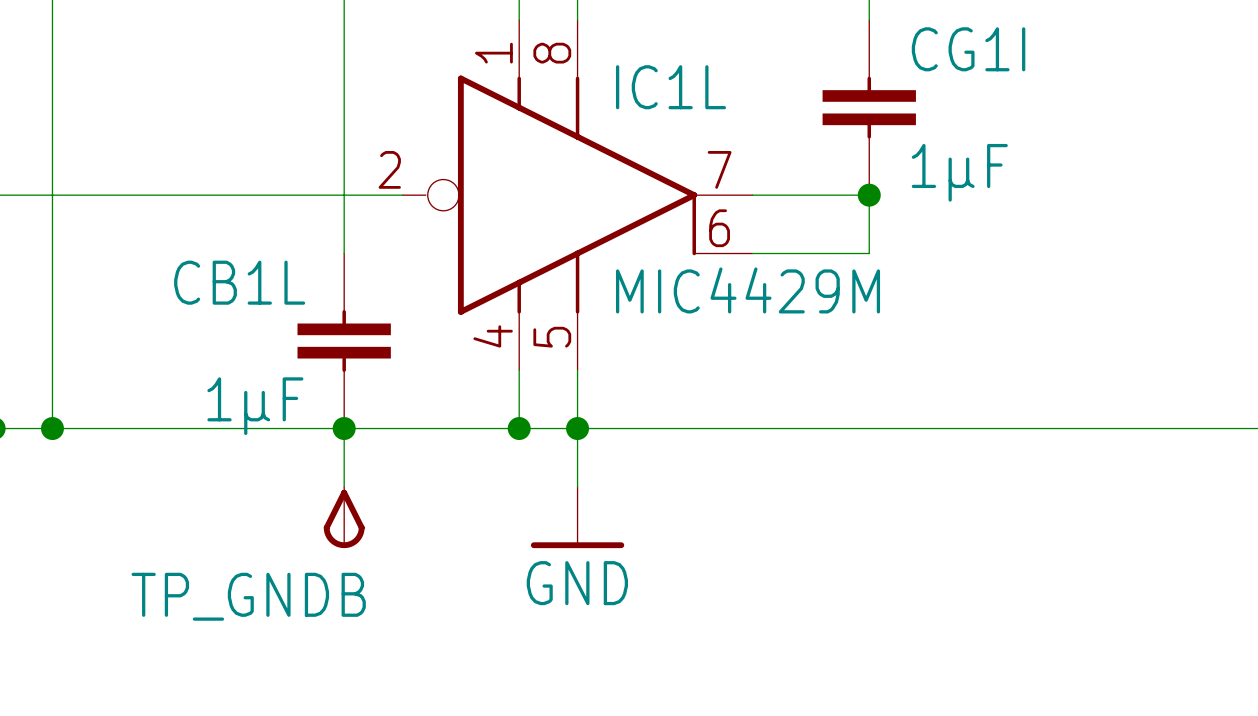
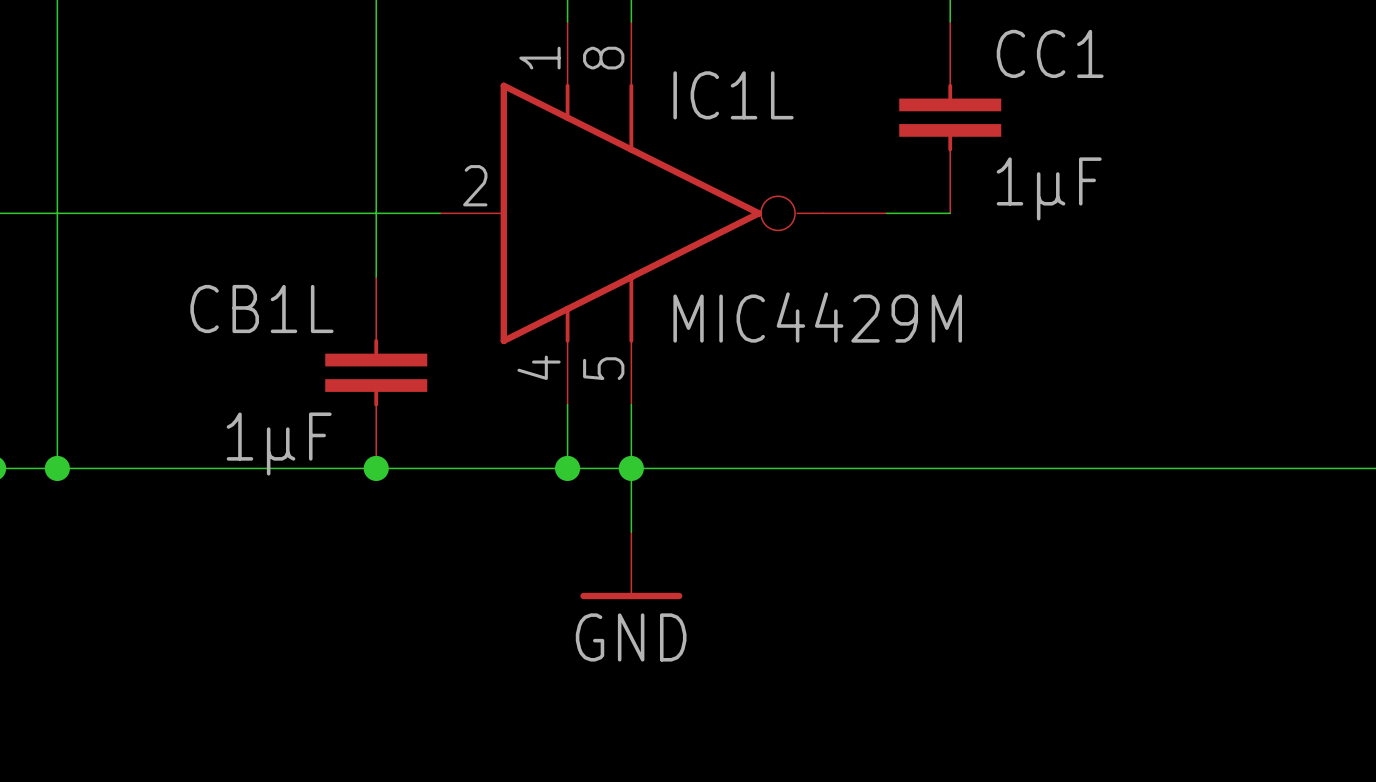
IC1L symbol: [402, 20, 753, 371] -> [440, 22, 887, 405]
CG1I name: CG1I (968, 49) -> CC1 (1050, 53)
wire: (869, 195) (869, 253) (752, 253) -> none
junction: (869, 195) -> none
wire: (344, 428) (344, 486) -> none
TP_GNDB: (344, 517) -> none

